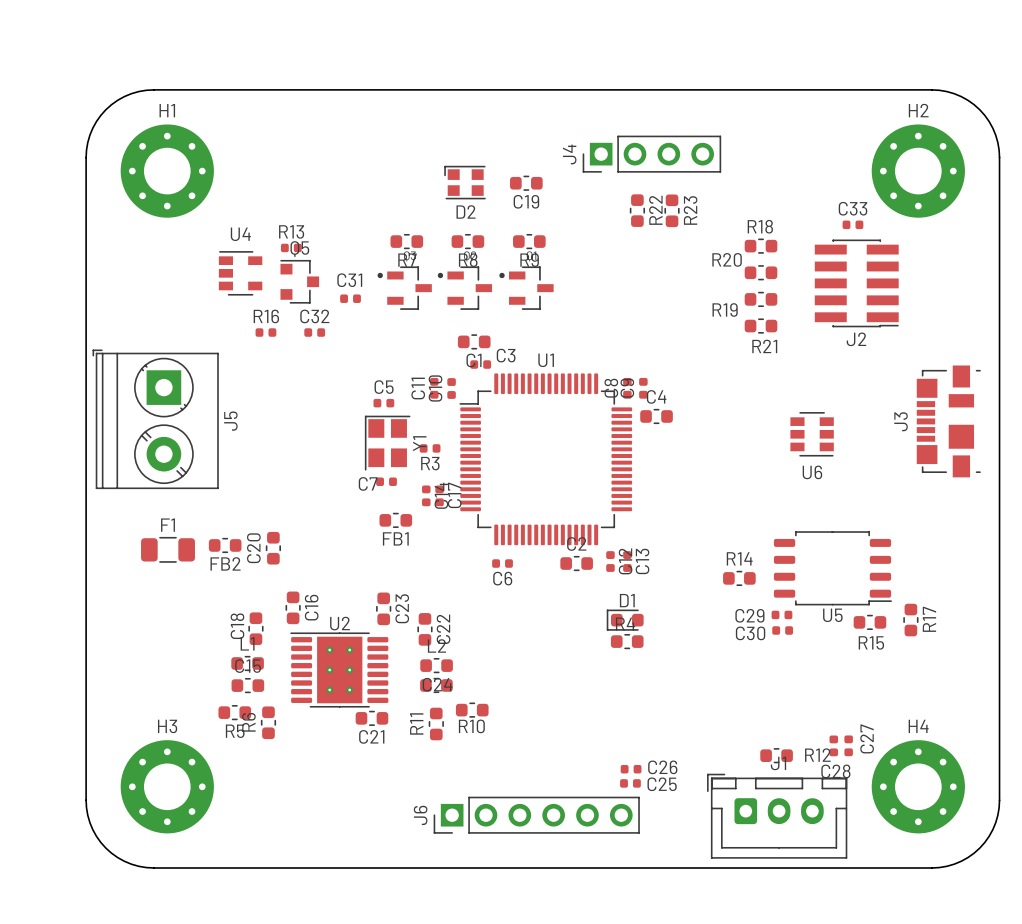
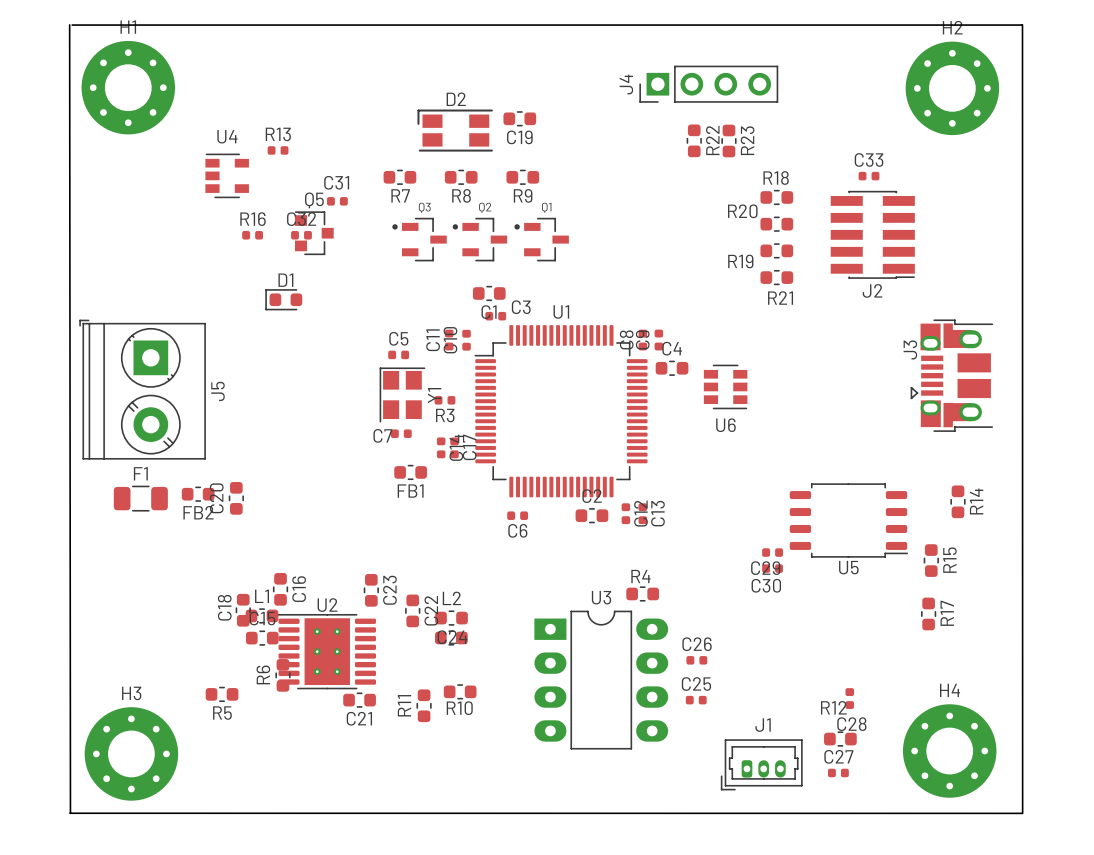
board edge: none -> (69, 24) (70, 813)
board edge: none -> (72, 25) (1021, 25)
board edge: none -> (1022, 24) (1022, 813)
board edge: (153, 89) (931, 89) (946, 91) (961, 96) (979, 109) (992, 128) (997, 142) (999, 157) (999, 800) (997, 815) (992, 829) (979, 848) (967, 857) (954, 864) (931, 867) (153, 867) (138, 866) (124, 861) (105, 848) (96, 836) (89, 822) (86, 800) (86, 149) (92, 128) (105, 109) (117, 100) (131, 93) (153, 89) -> none
J4 position: (651, 154) -> (708, 84)
D2 footprint: [444, 165, 486, 200] -> [417, 109, 493, 152]
H1 position: (167, 171) -> (128, 87)
H2 position: (918, 171) -> (952, 88)
C19 position: (526, 183) -> (519, 118)
R22 position: (637, 210) -> (694, 140)
R23 position: (672, 210) -> (728, 141)
D2 name position: D2 (466, 211) -> D2 (456, 99)
R7 position: (406, 241) -> (399, 177)
R8 position: (467, 241) -> (461, 177)
R9 position: (529, 241) -> (522, 177)
R13 position: (291, 247) -> (278, 150)
U4 position: (240, 273) -> (227, 175)
C31 position: (350, 298) -> (337, 201)
R16 position: (265, 332) -> (252, 235)
C32 position: (314, 332) -> (301, 235)
J3 footprint: [916, 365, 981, 478] -> [910, 319, 994, 432]
J5 position: (155, 419) -> (142, 389)
J3 name position: J3 (901, 421) -> J3 (910, 349)
U6 position: (812, 434) -> (725, 386)
FB2 position: (225, 545) -> (198, 494)
C20 position: (273, 548) -> (236, 498)
F1 position: (168, 549) -> (140, 498)
R14 rotation: 0° (739, 578) -> 90° clockwise (957, 501)
R14 position: (739, 578) -> (957, 501)
C16 position: (293, 607) -> (280, 589)
C23 position: (383, 608) -> (371, 590)
C29 position: (781, 614) -> (772, 568)
D1 position: (625, 620) -> (283, 299)
R17 position: (910, 620) -> (928, 613)
R15 rotation: 0° (869, 622) -> 90° clockwise (931, 560)
R15 position: (869, 622) -> (931, 560)
C18 position: (255, 628) -> (243, 610)
C22 position: (424, 629) -> (412, 610)
C30 position: (782, 630) -> (772, 552)
R15 name position: R15 (871, 642) -> R15 (949, 560)
U2 position: (339, 670) -> (326, 651)
R10 position: (472, 710) -> (460, 691)
R5 position: (234, 712) -> (222, 694)
C21 position: (371, 718) -> (359, 700)
R11 position: (436, 723) -> (424, 705)
U3: none -> (601, 680)
C27 rotation: 0° (848, 745) -> 90° clockwise (838, 772)
C27 position: (848, 745) -> (838, 772)
R12 position: (776, 755) -> (840, 739)
C26 name position: C26 (662, 767) -> C26 (697, 644)
C26 position: (631, 769) -> (696, 660)
J1 footprint: [707, 773, 848, 859] -> [720, 739, 803, 791]
C25 position: (630, 783) -> (696, 700)
C25 name position: C25 (662, 784) -> C25 (696, 684)
H3 position: (167, 786) -> (131, 753)
H4 position: (918, 786) -> (949, 751)
J6: (536, 815) -> none
board edge: none -> (70, 813) (1022, 813)

